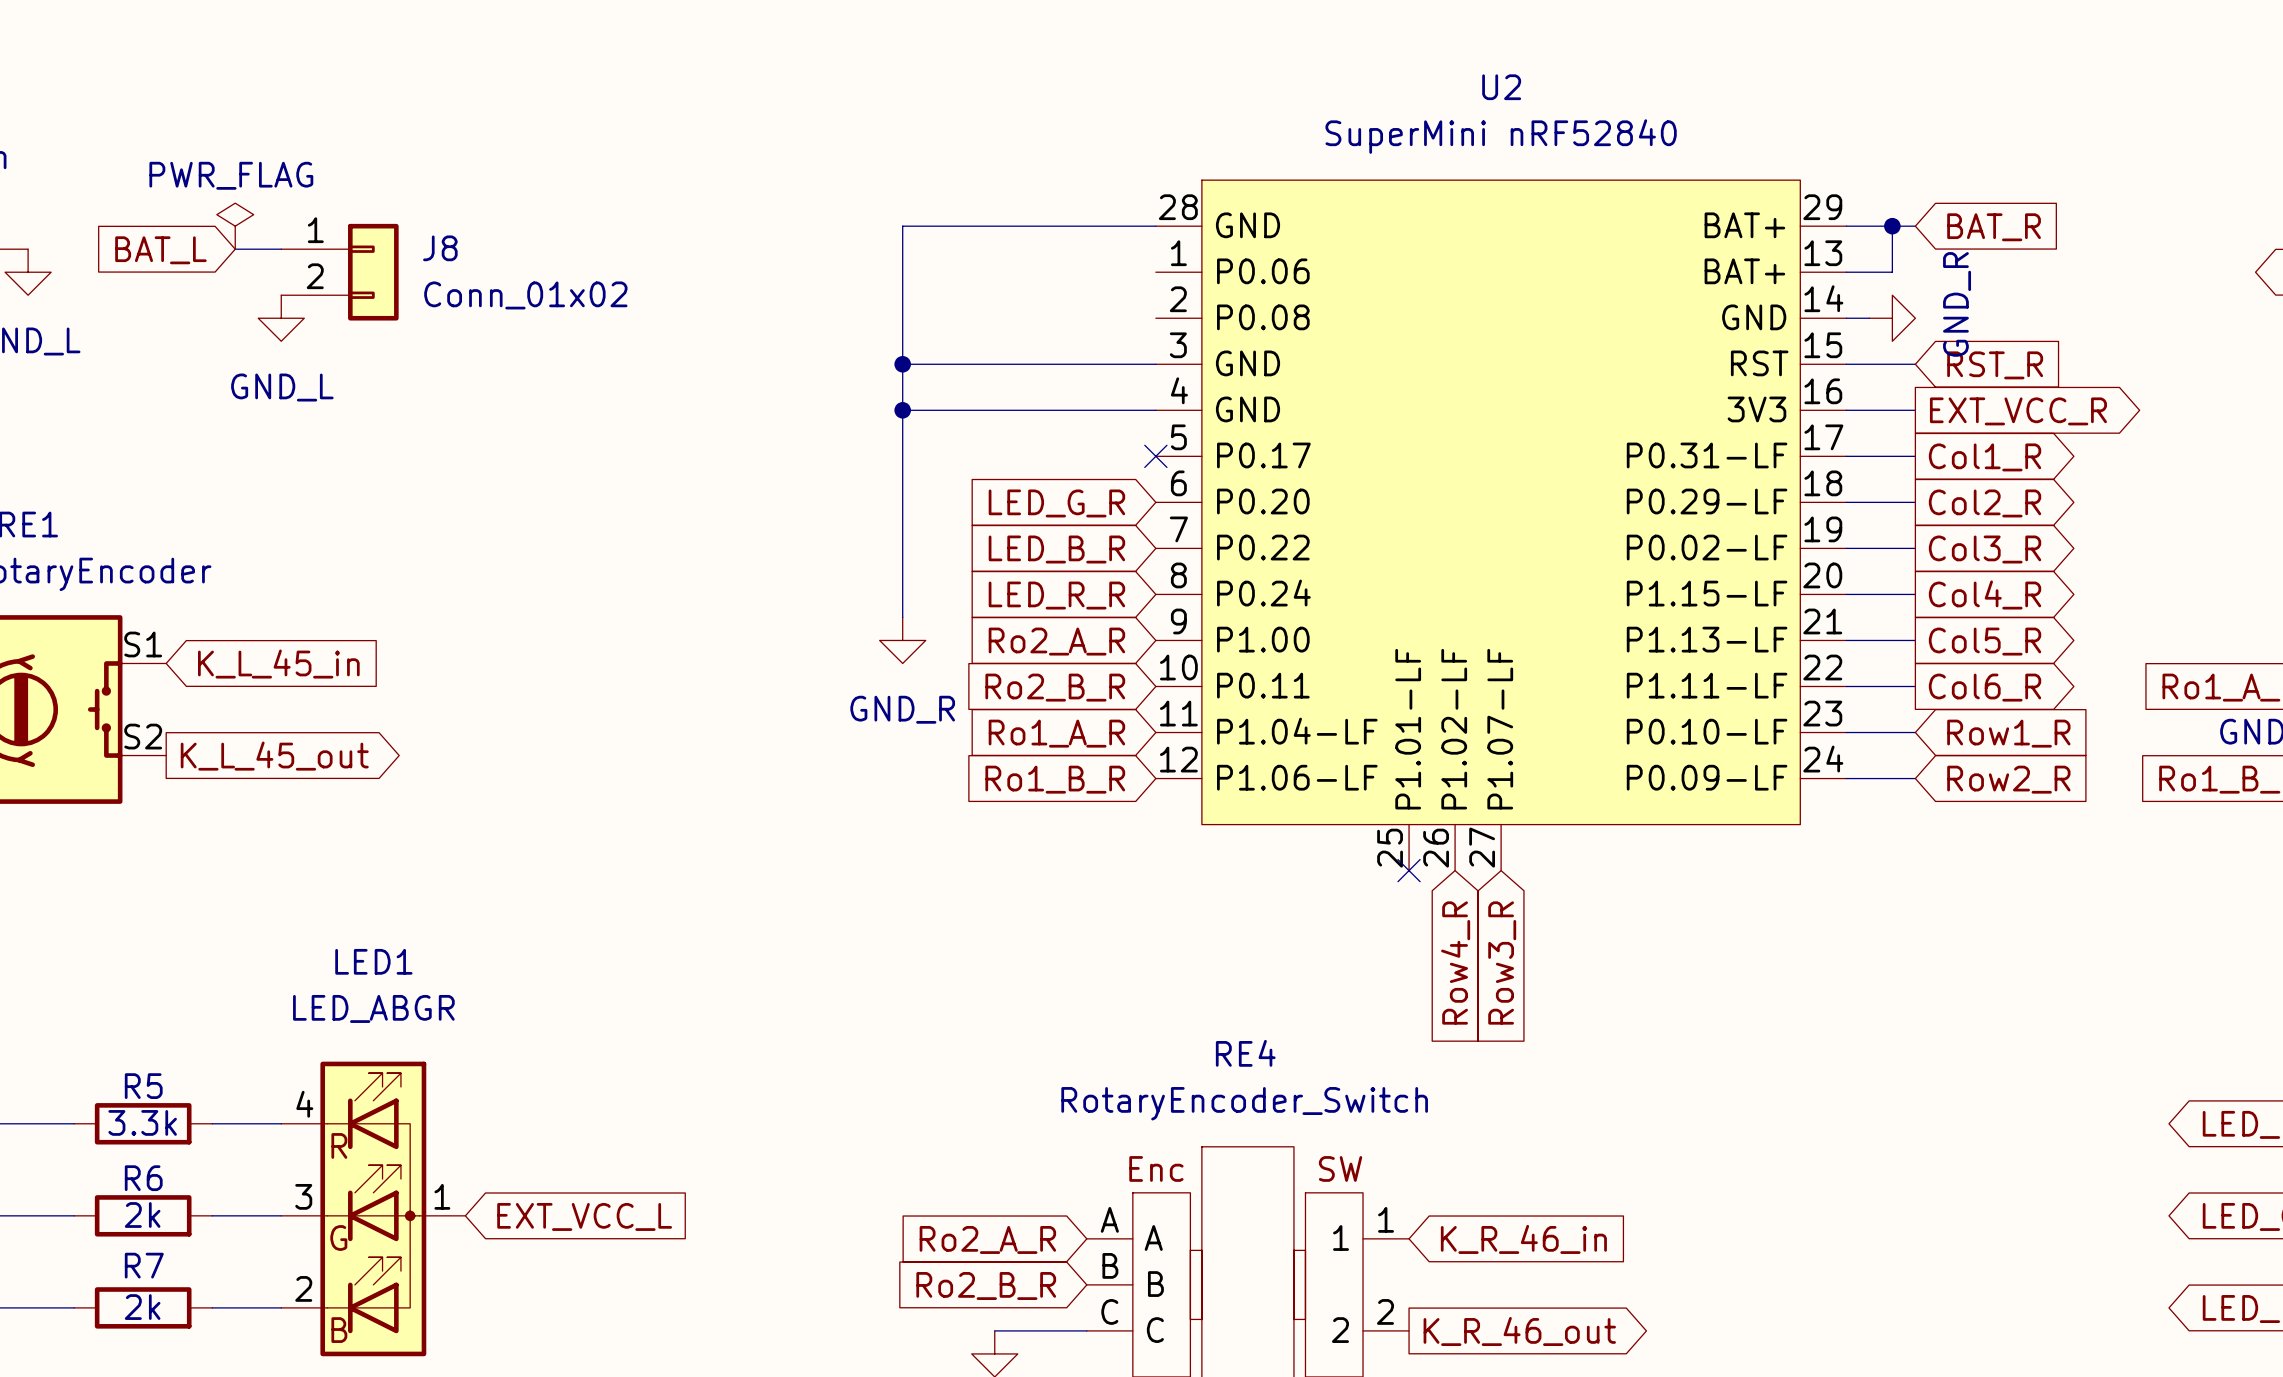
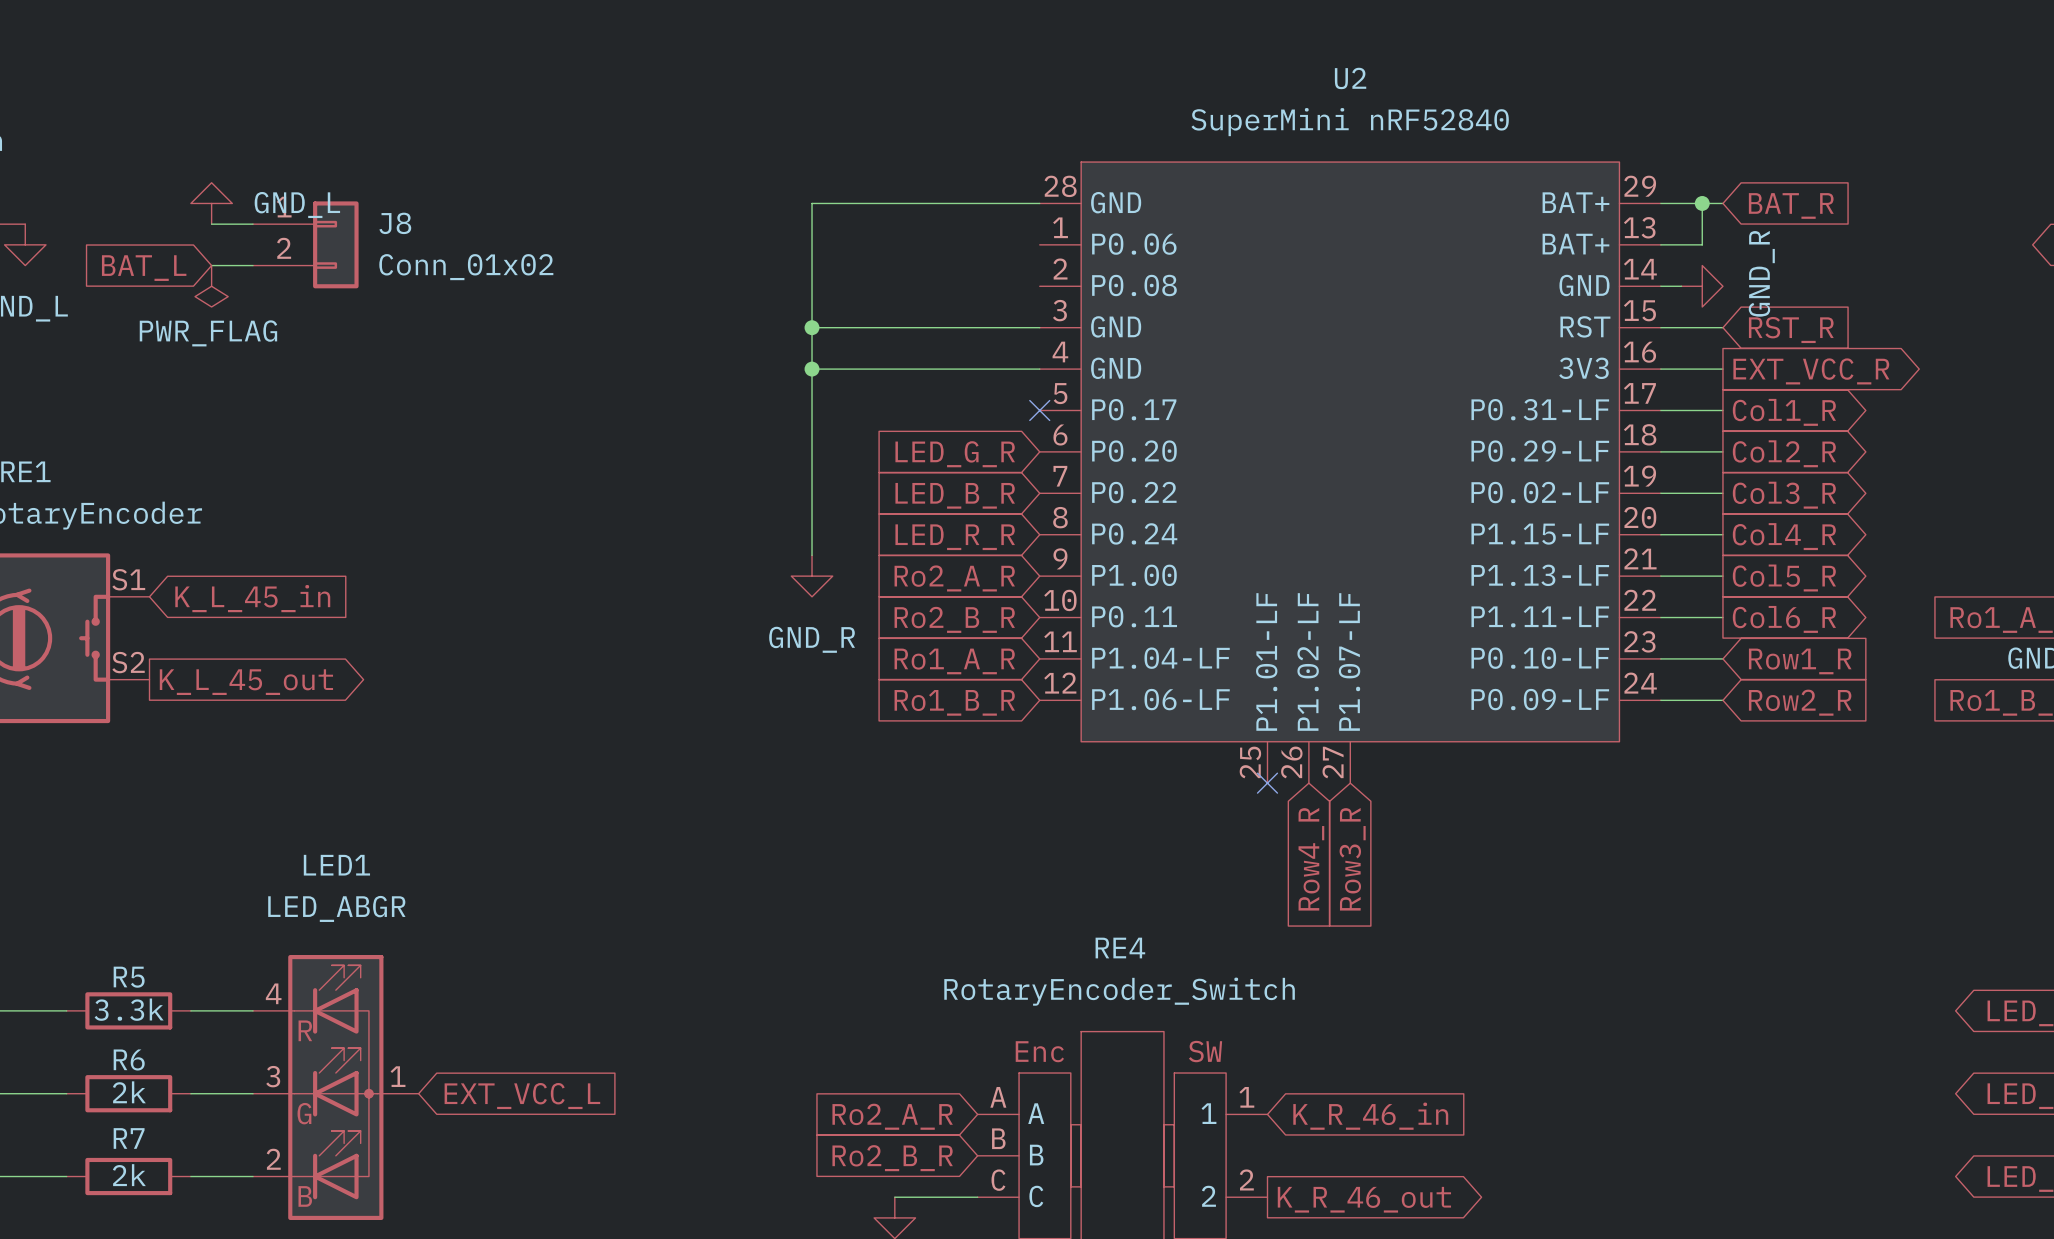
power symbol: PWR_FLAG (235, 226) -> GND_L (211, 203)
global label position: BAT_L (160, 250) -> BAT_L (144, 268)
wire: none -> (211, 265) (253, 265)
power symbol: none -> PWR_FLAG (211, 286)
power symbol: GND_L (281, 318) -> none

